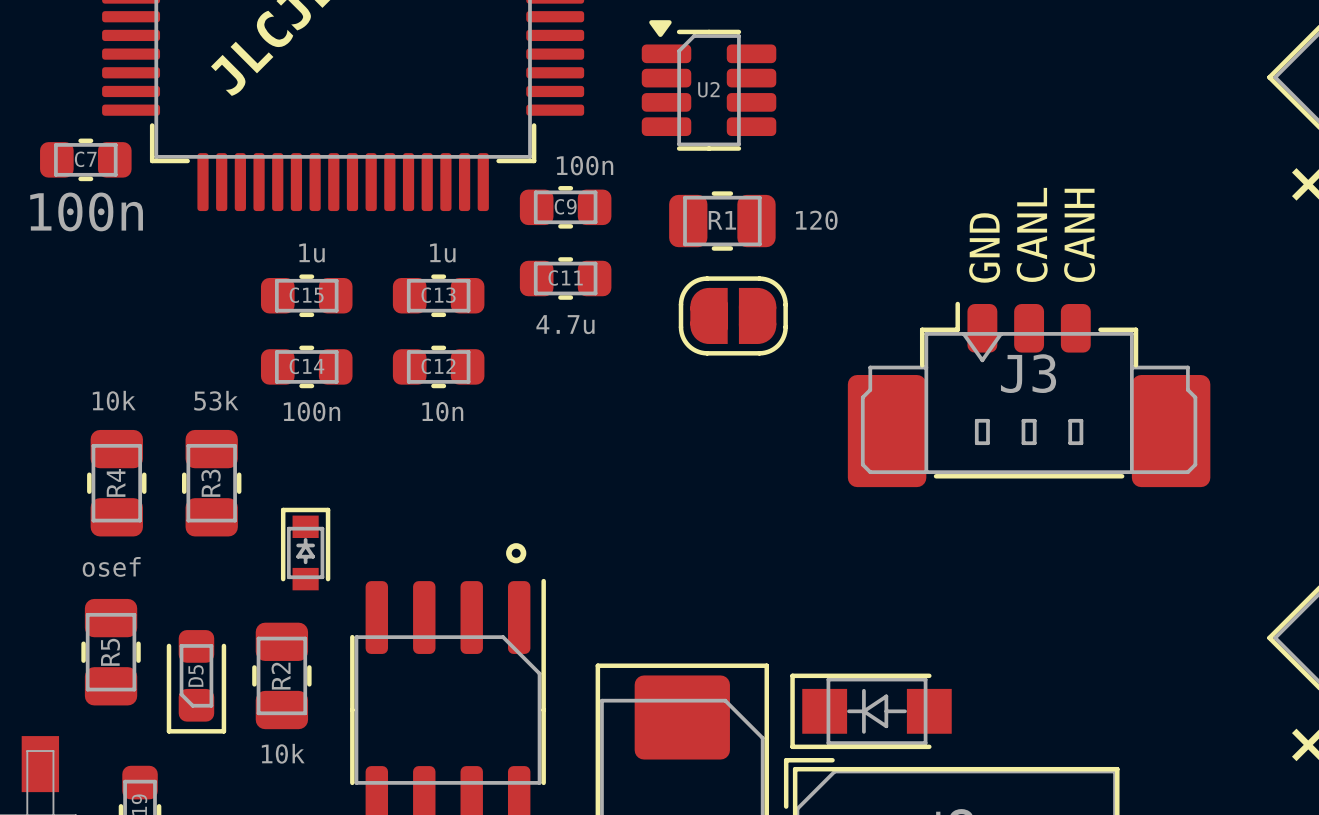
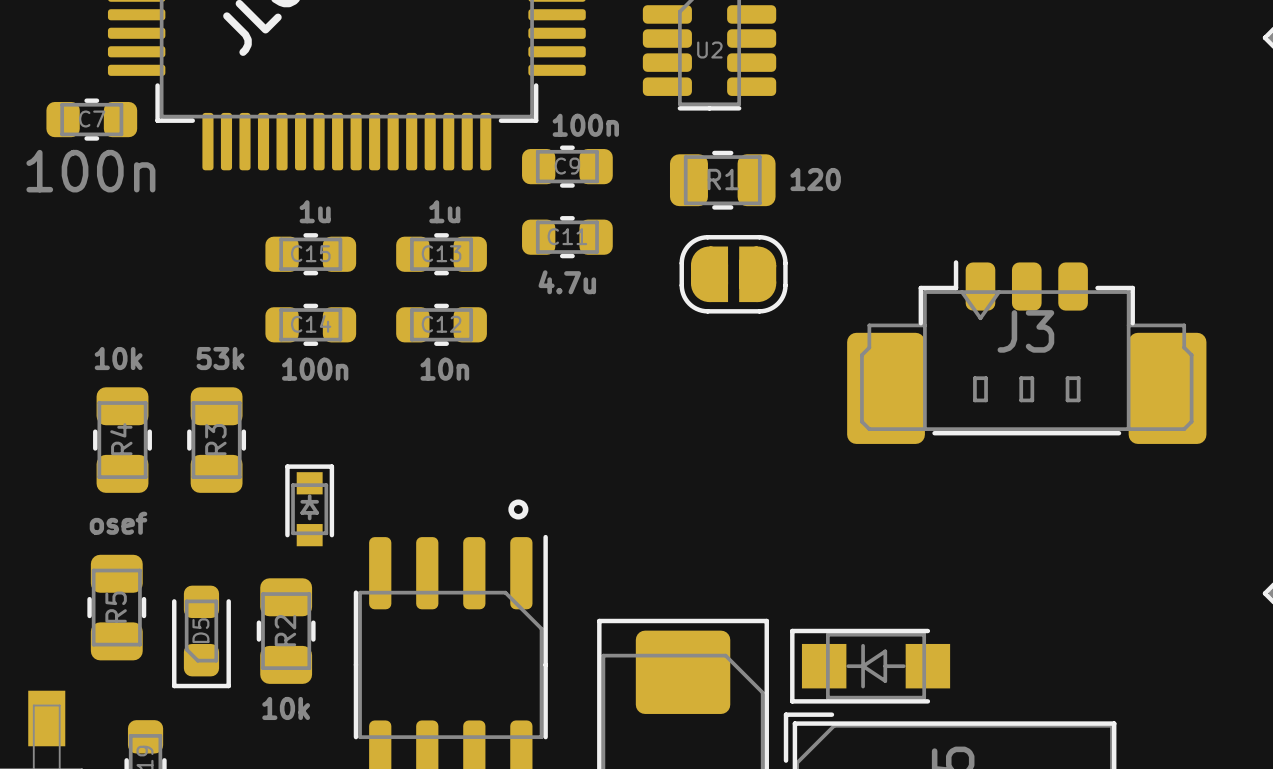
text: CANL (1032, 234) -> none
text: CANH (1079, 235) -> none
text: GND (984, 247) -> none

